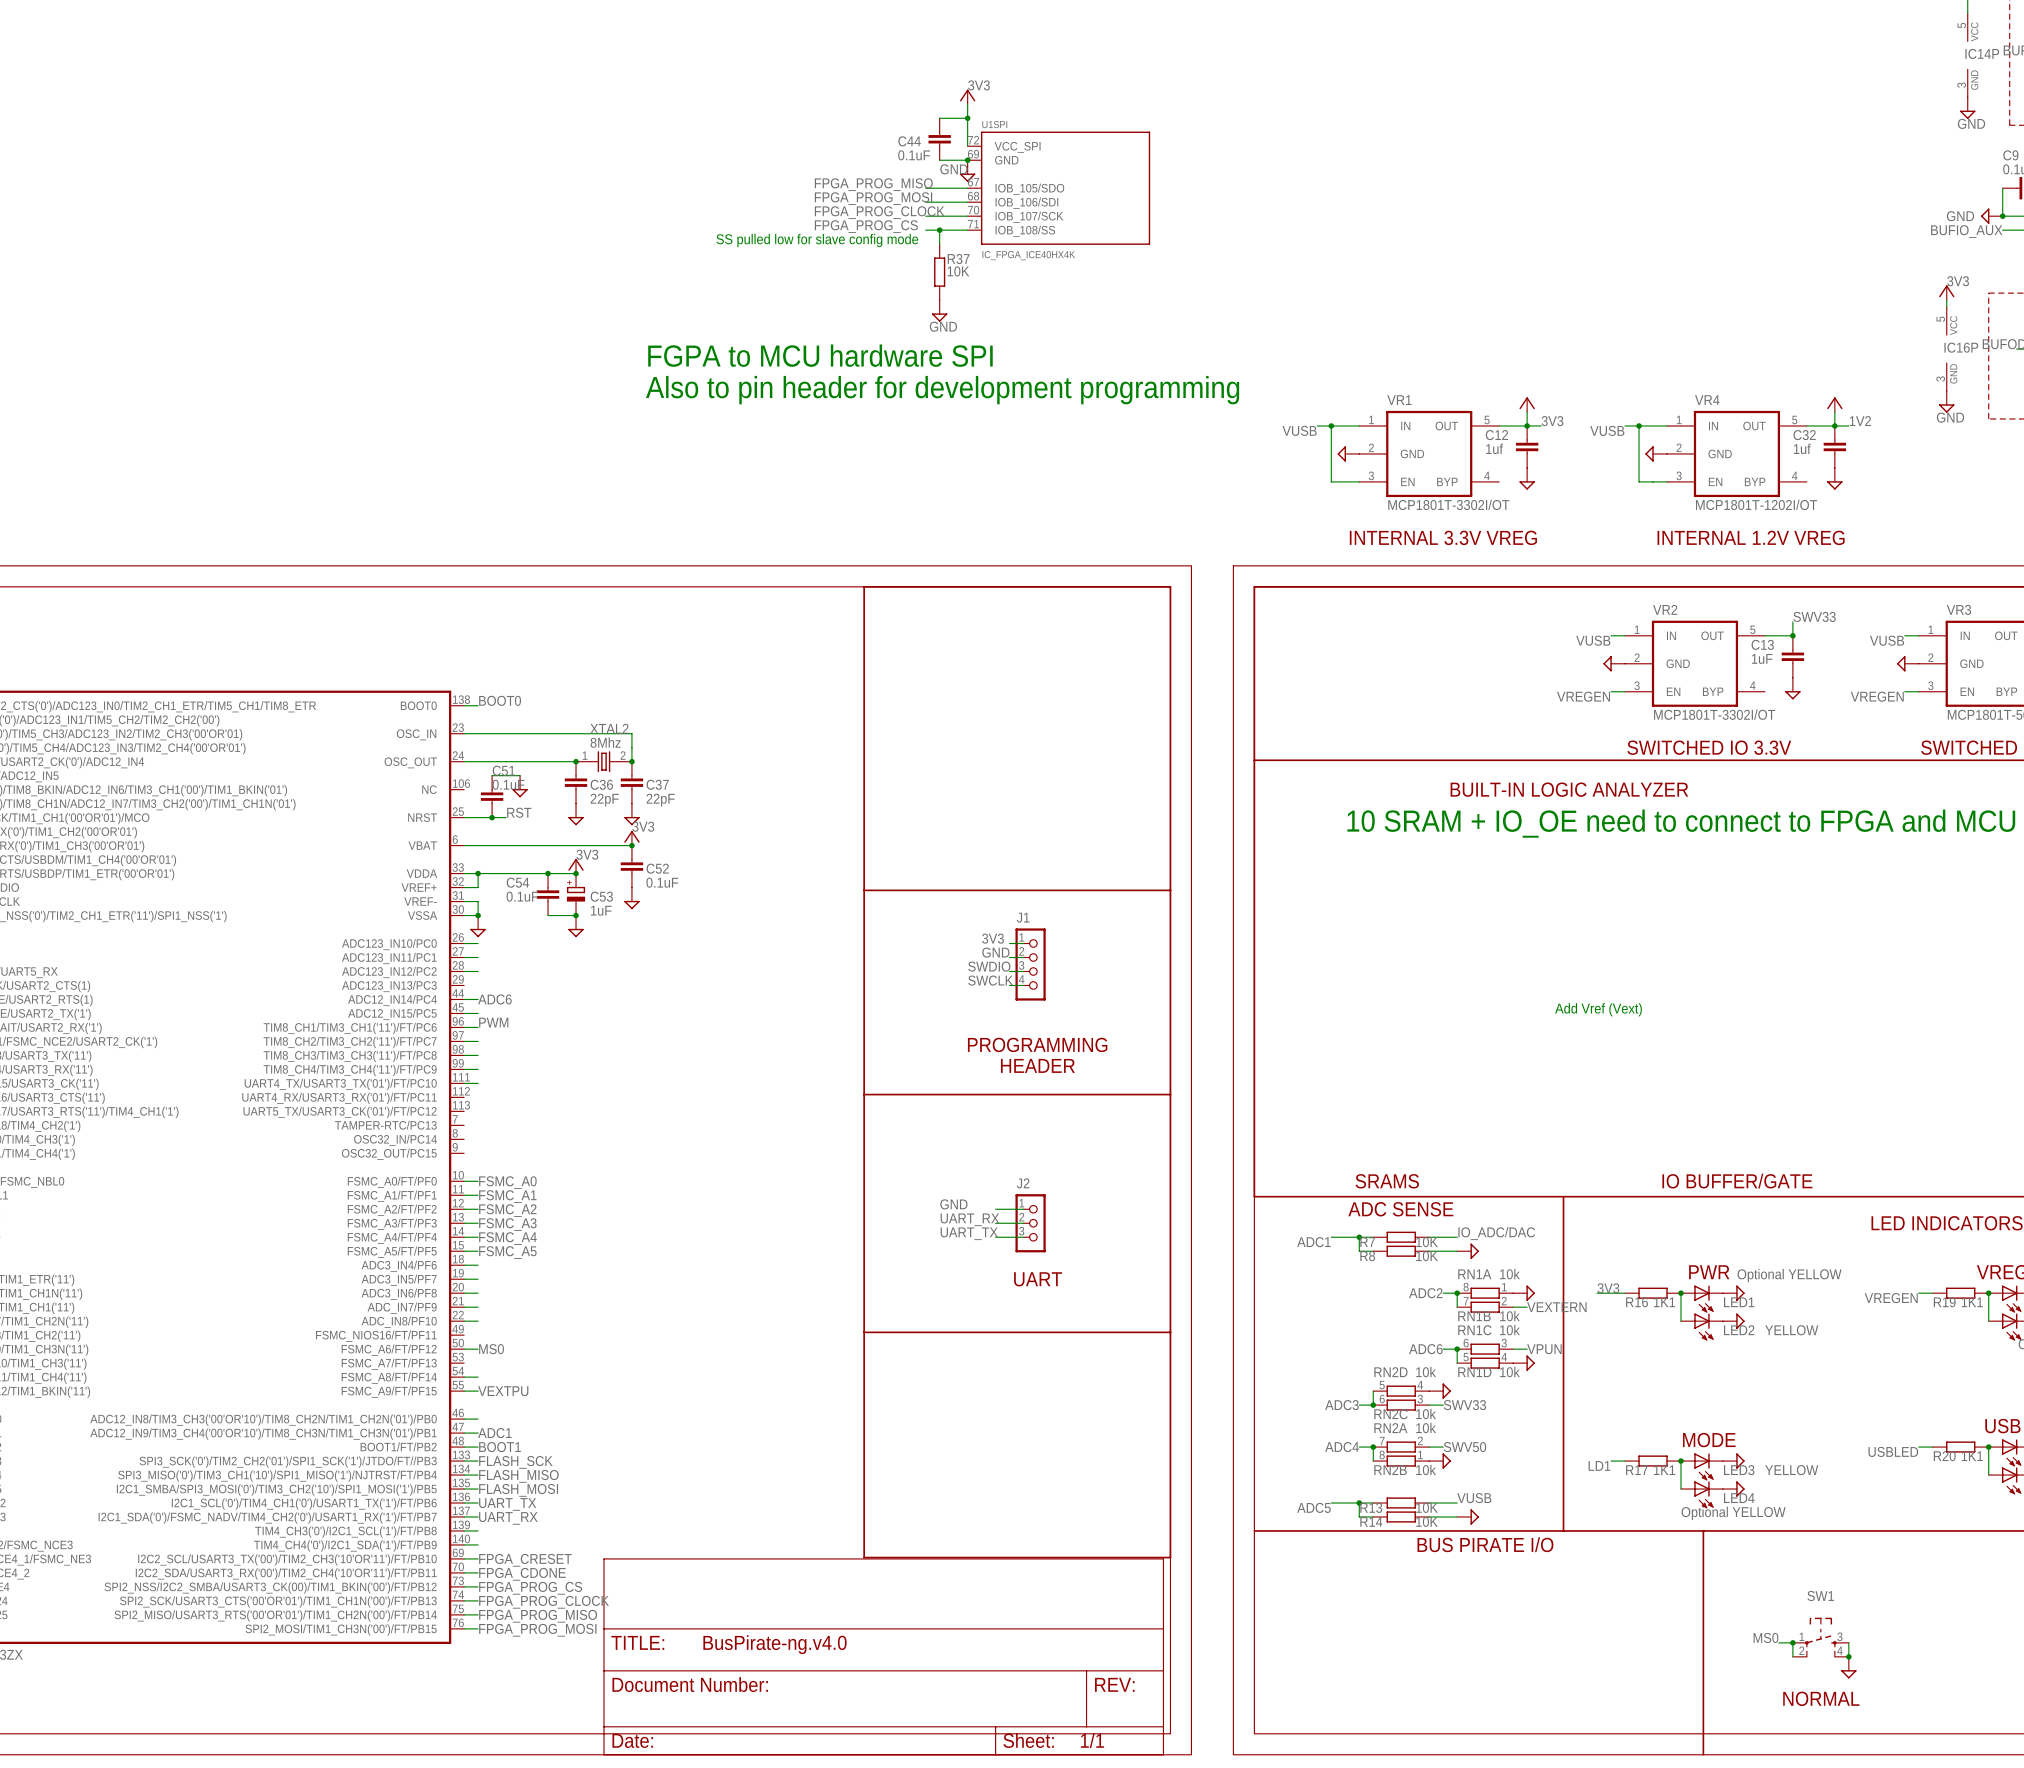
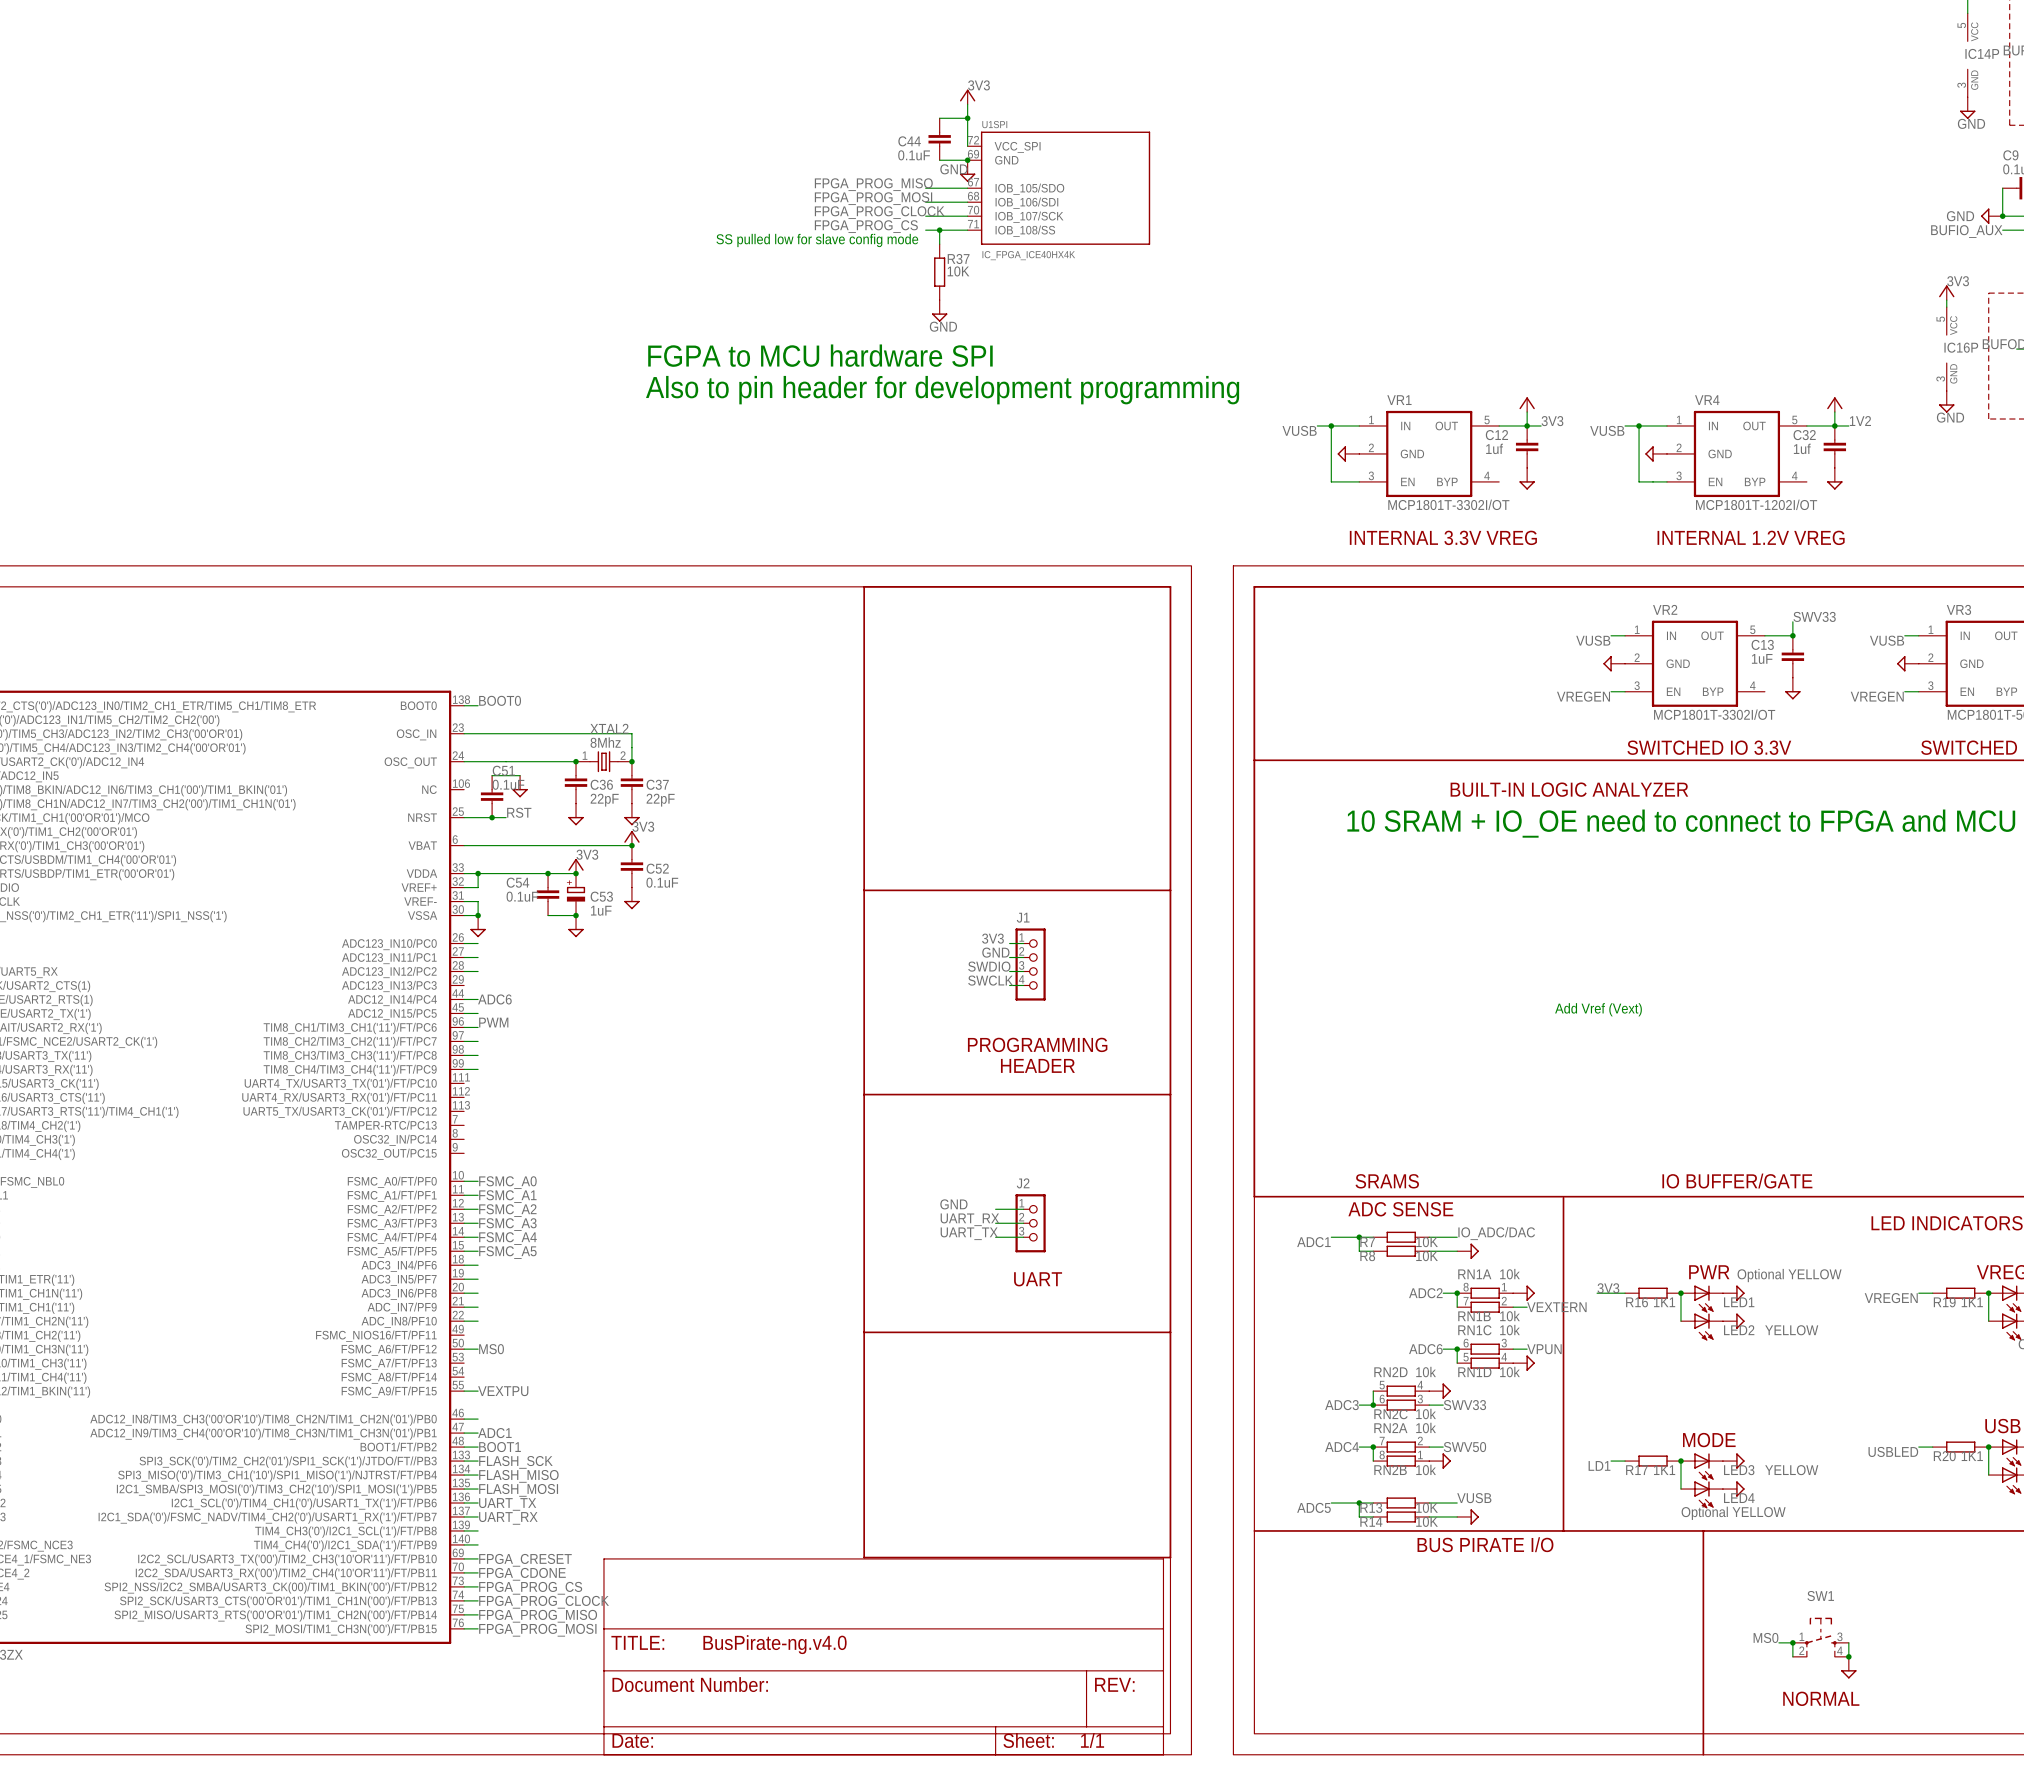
wire: (464, 1083) (478, 1083) -> none
wire: (464, 1377) (478, 1377) -> none

